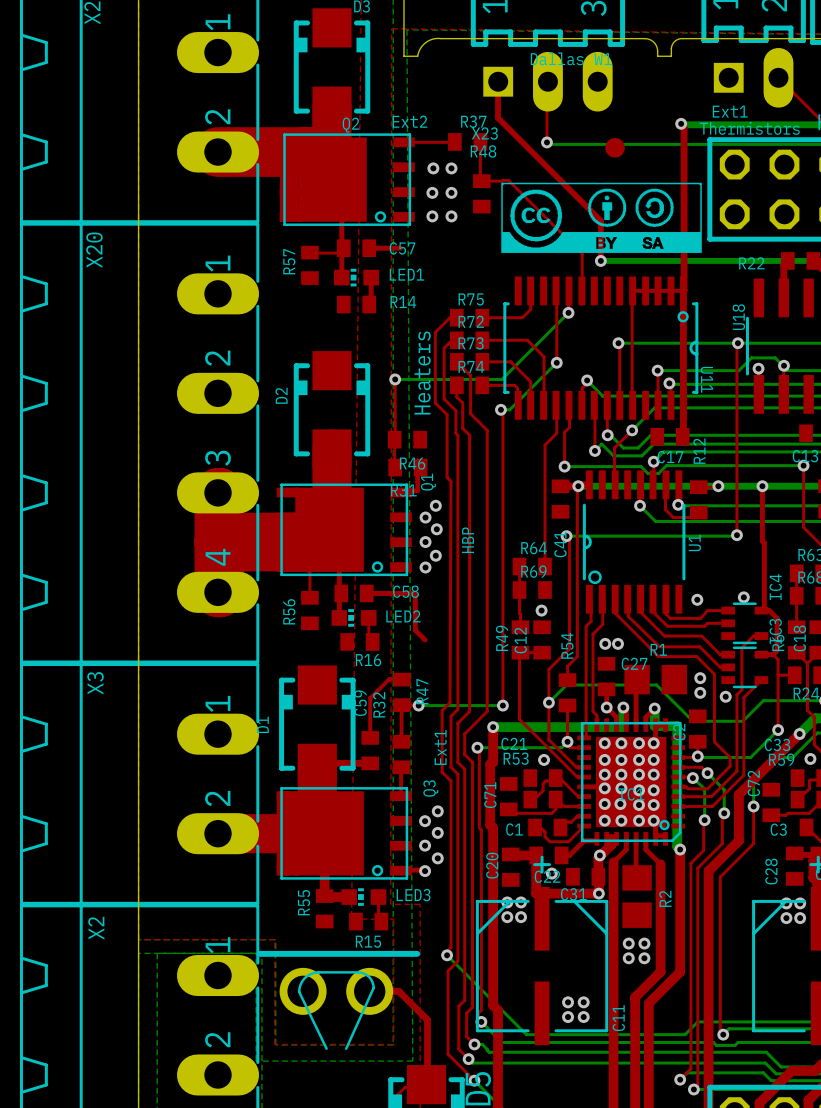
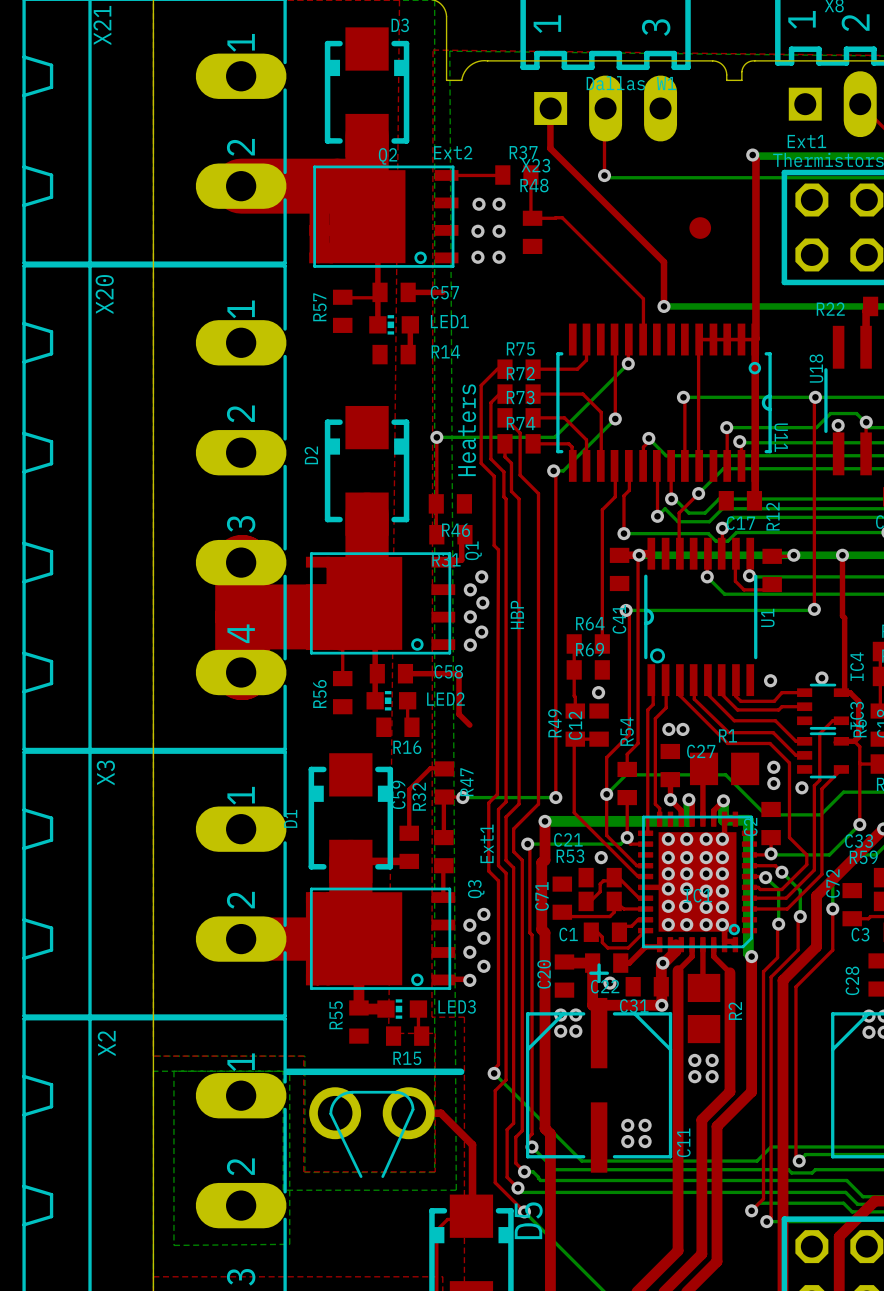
part position: (615, 147) -> (700, 228)
drawing: [501, 182, 702, 253] -> none

